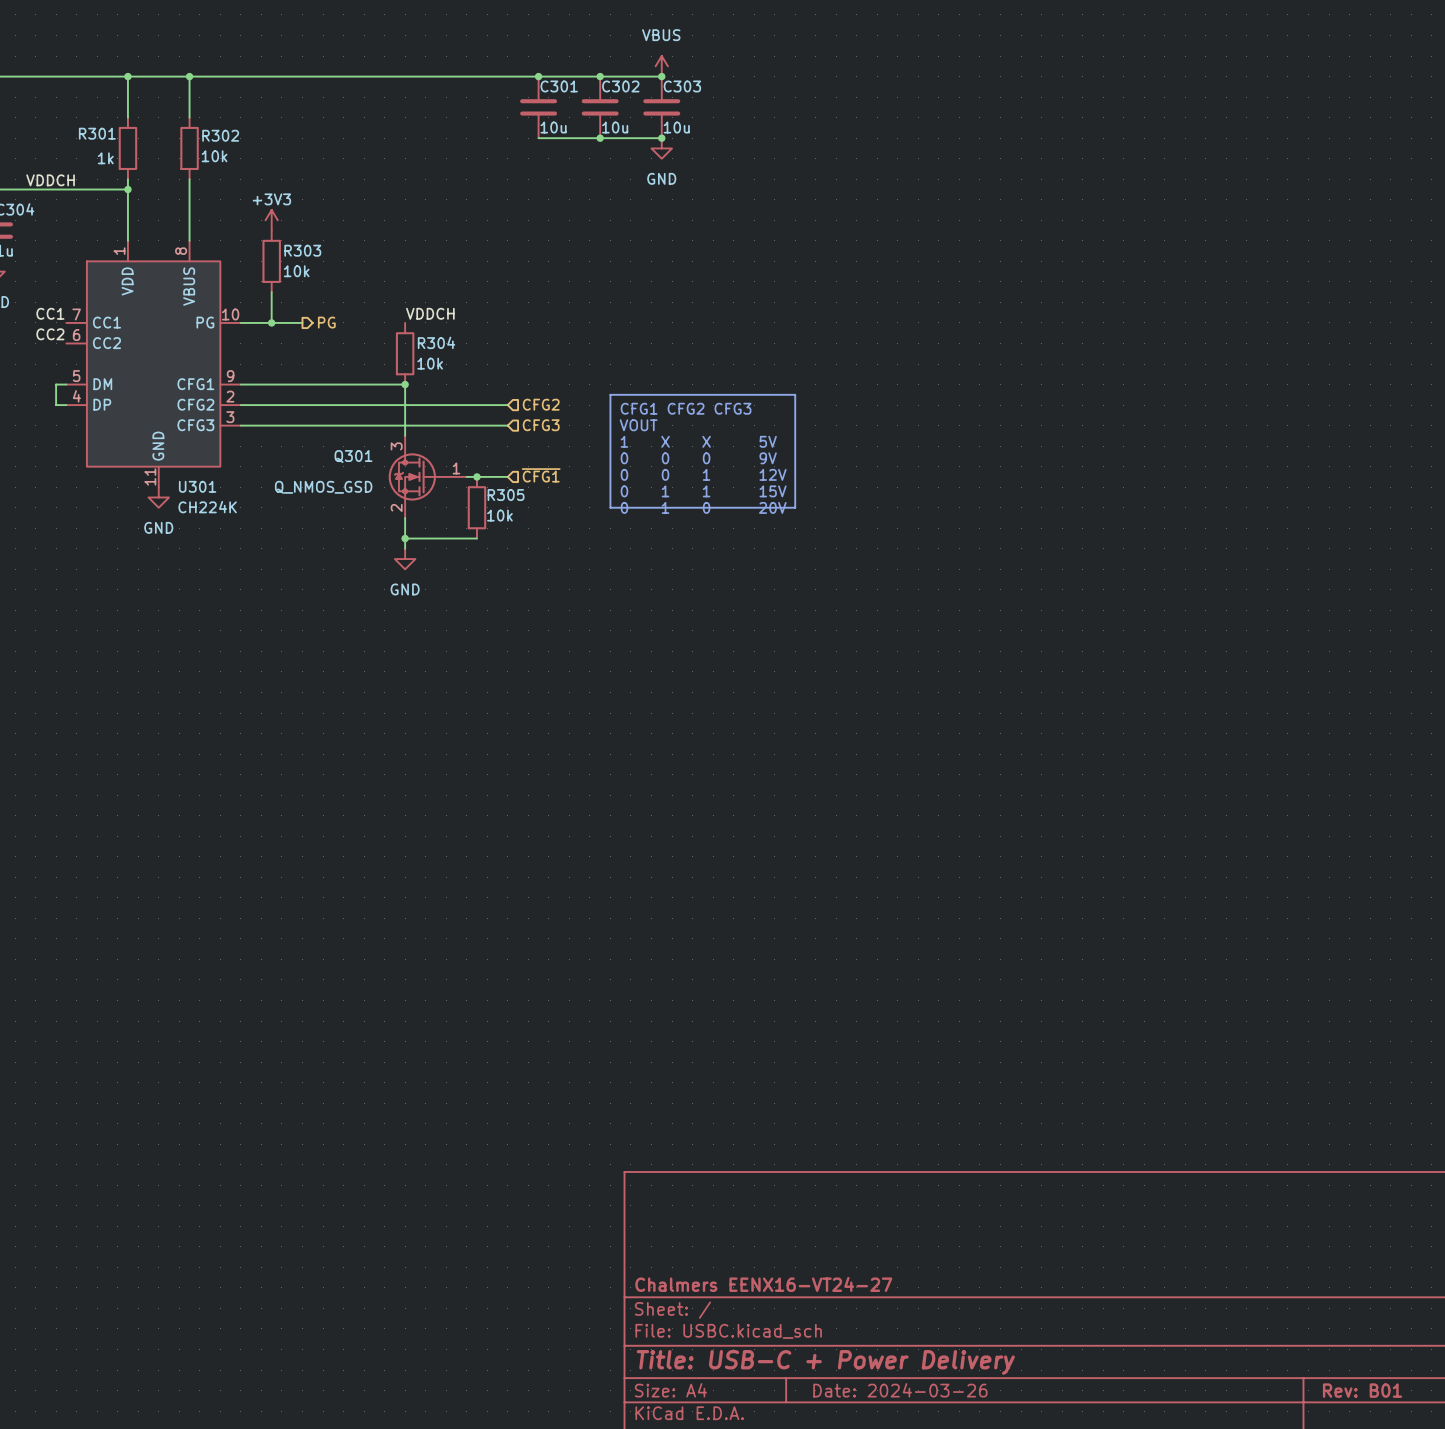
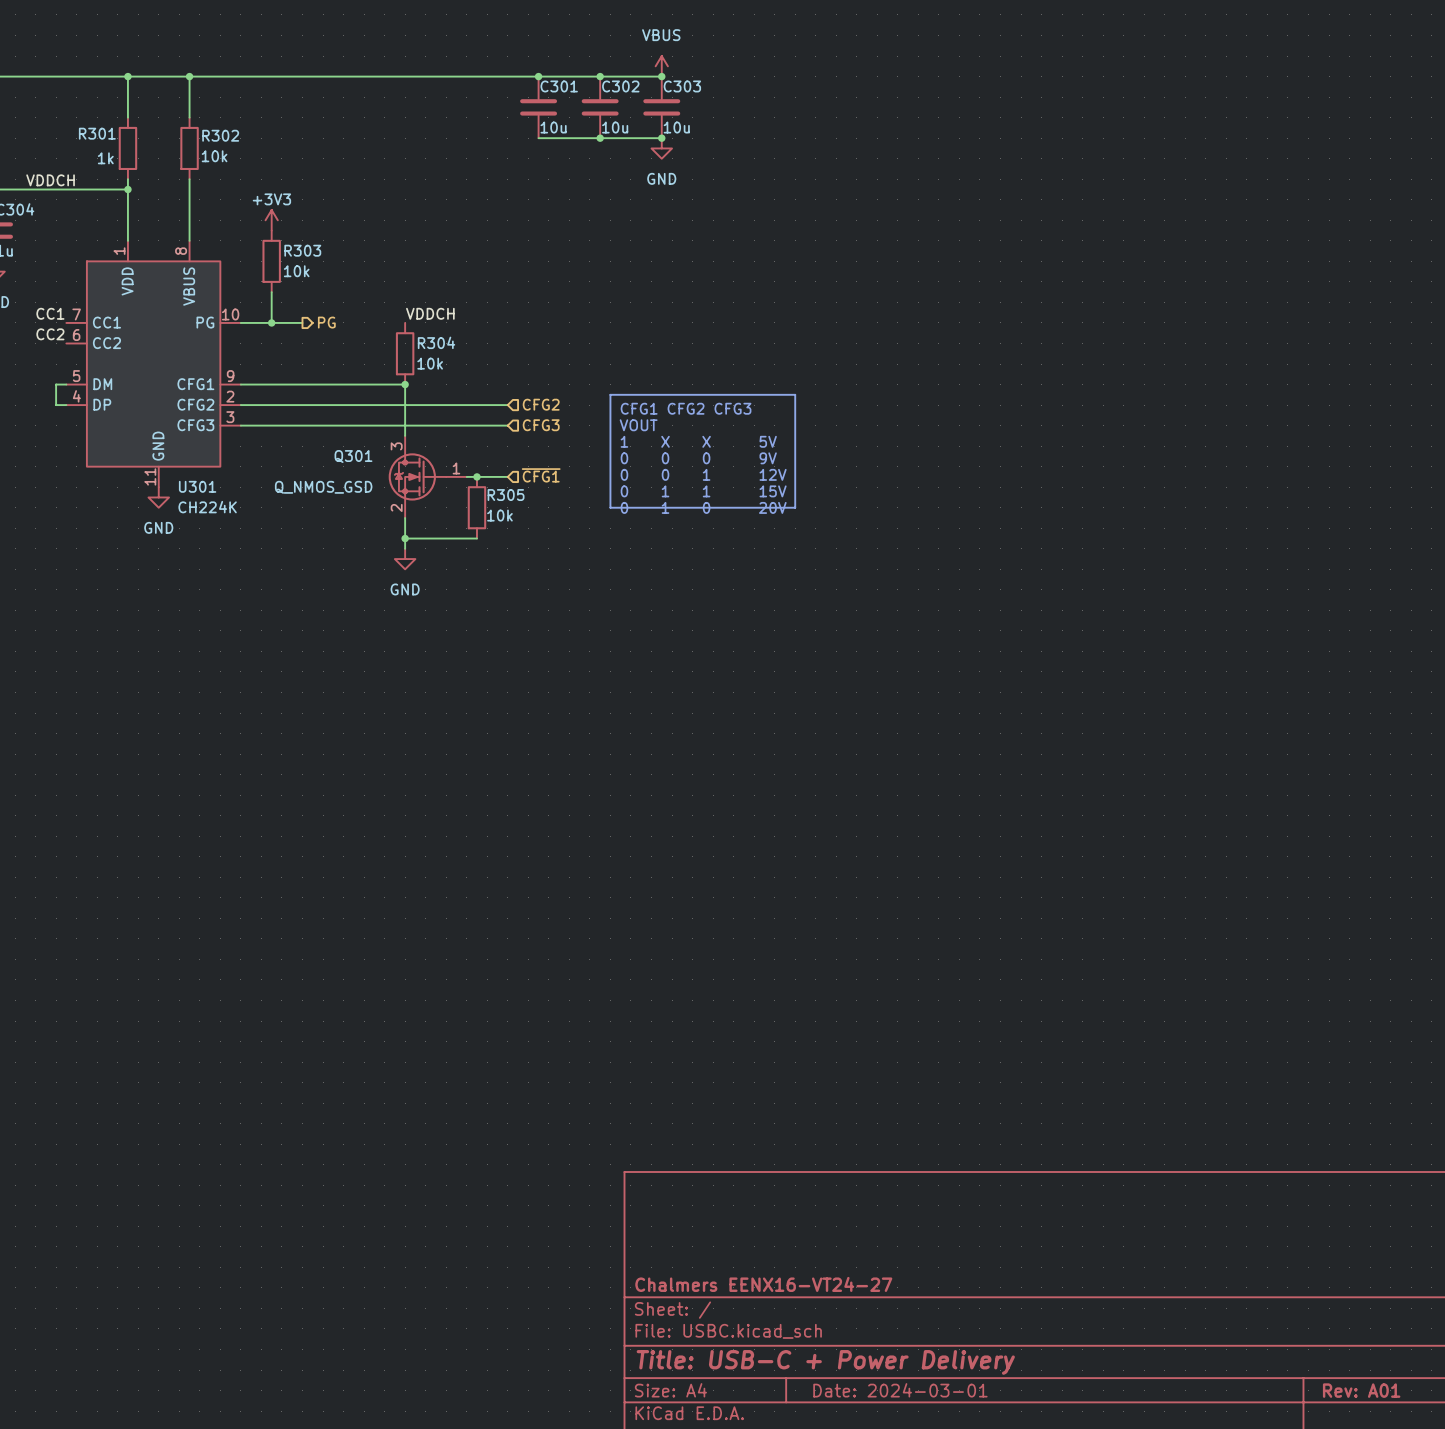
title block: Date: 2024-03-26 (900, 1390) -> Date: 2024-03-01 (900, 1390)
title block: Rev: B01 (1362, 1390) -> Rev: A01 (1361, 1390)

